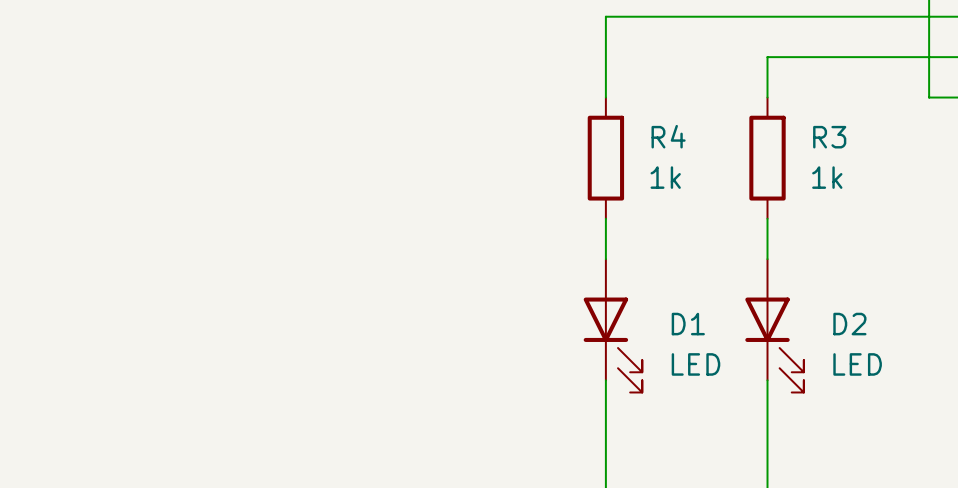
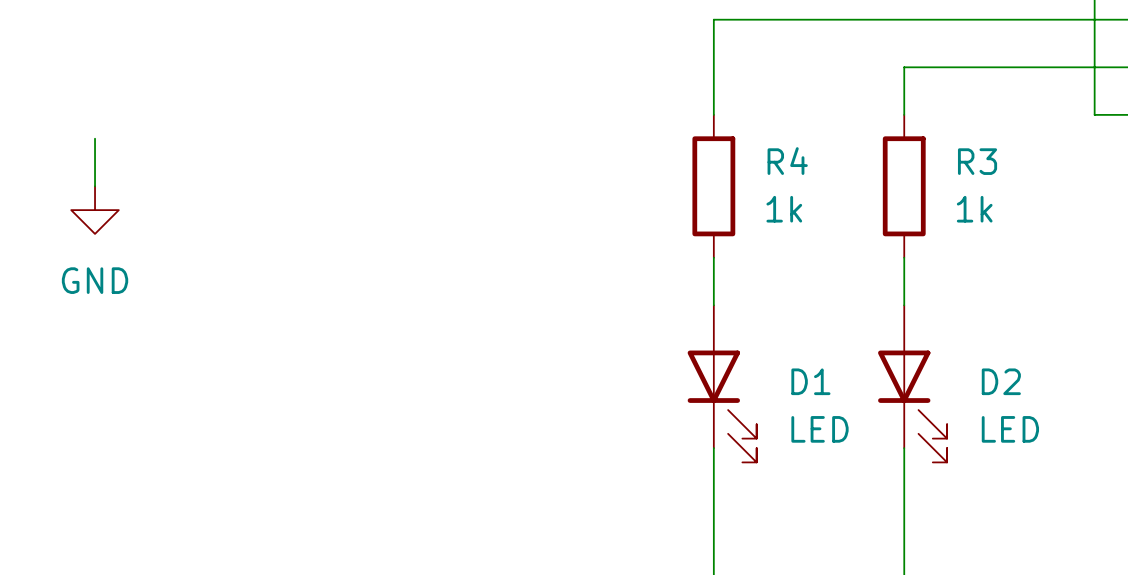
wire: none -> (95, 138) (95, 186)
power symbol: none -> GND (95, 210)

